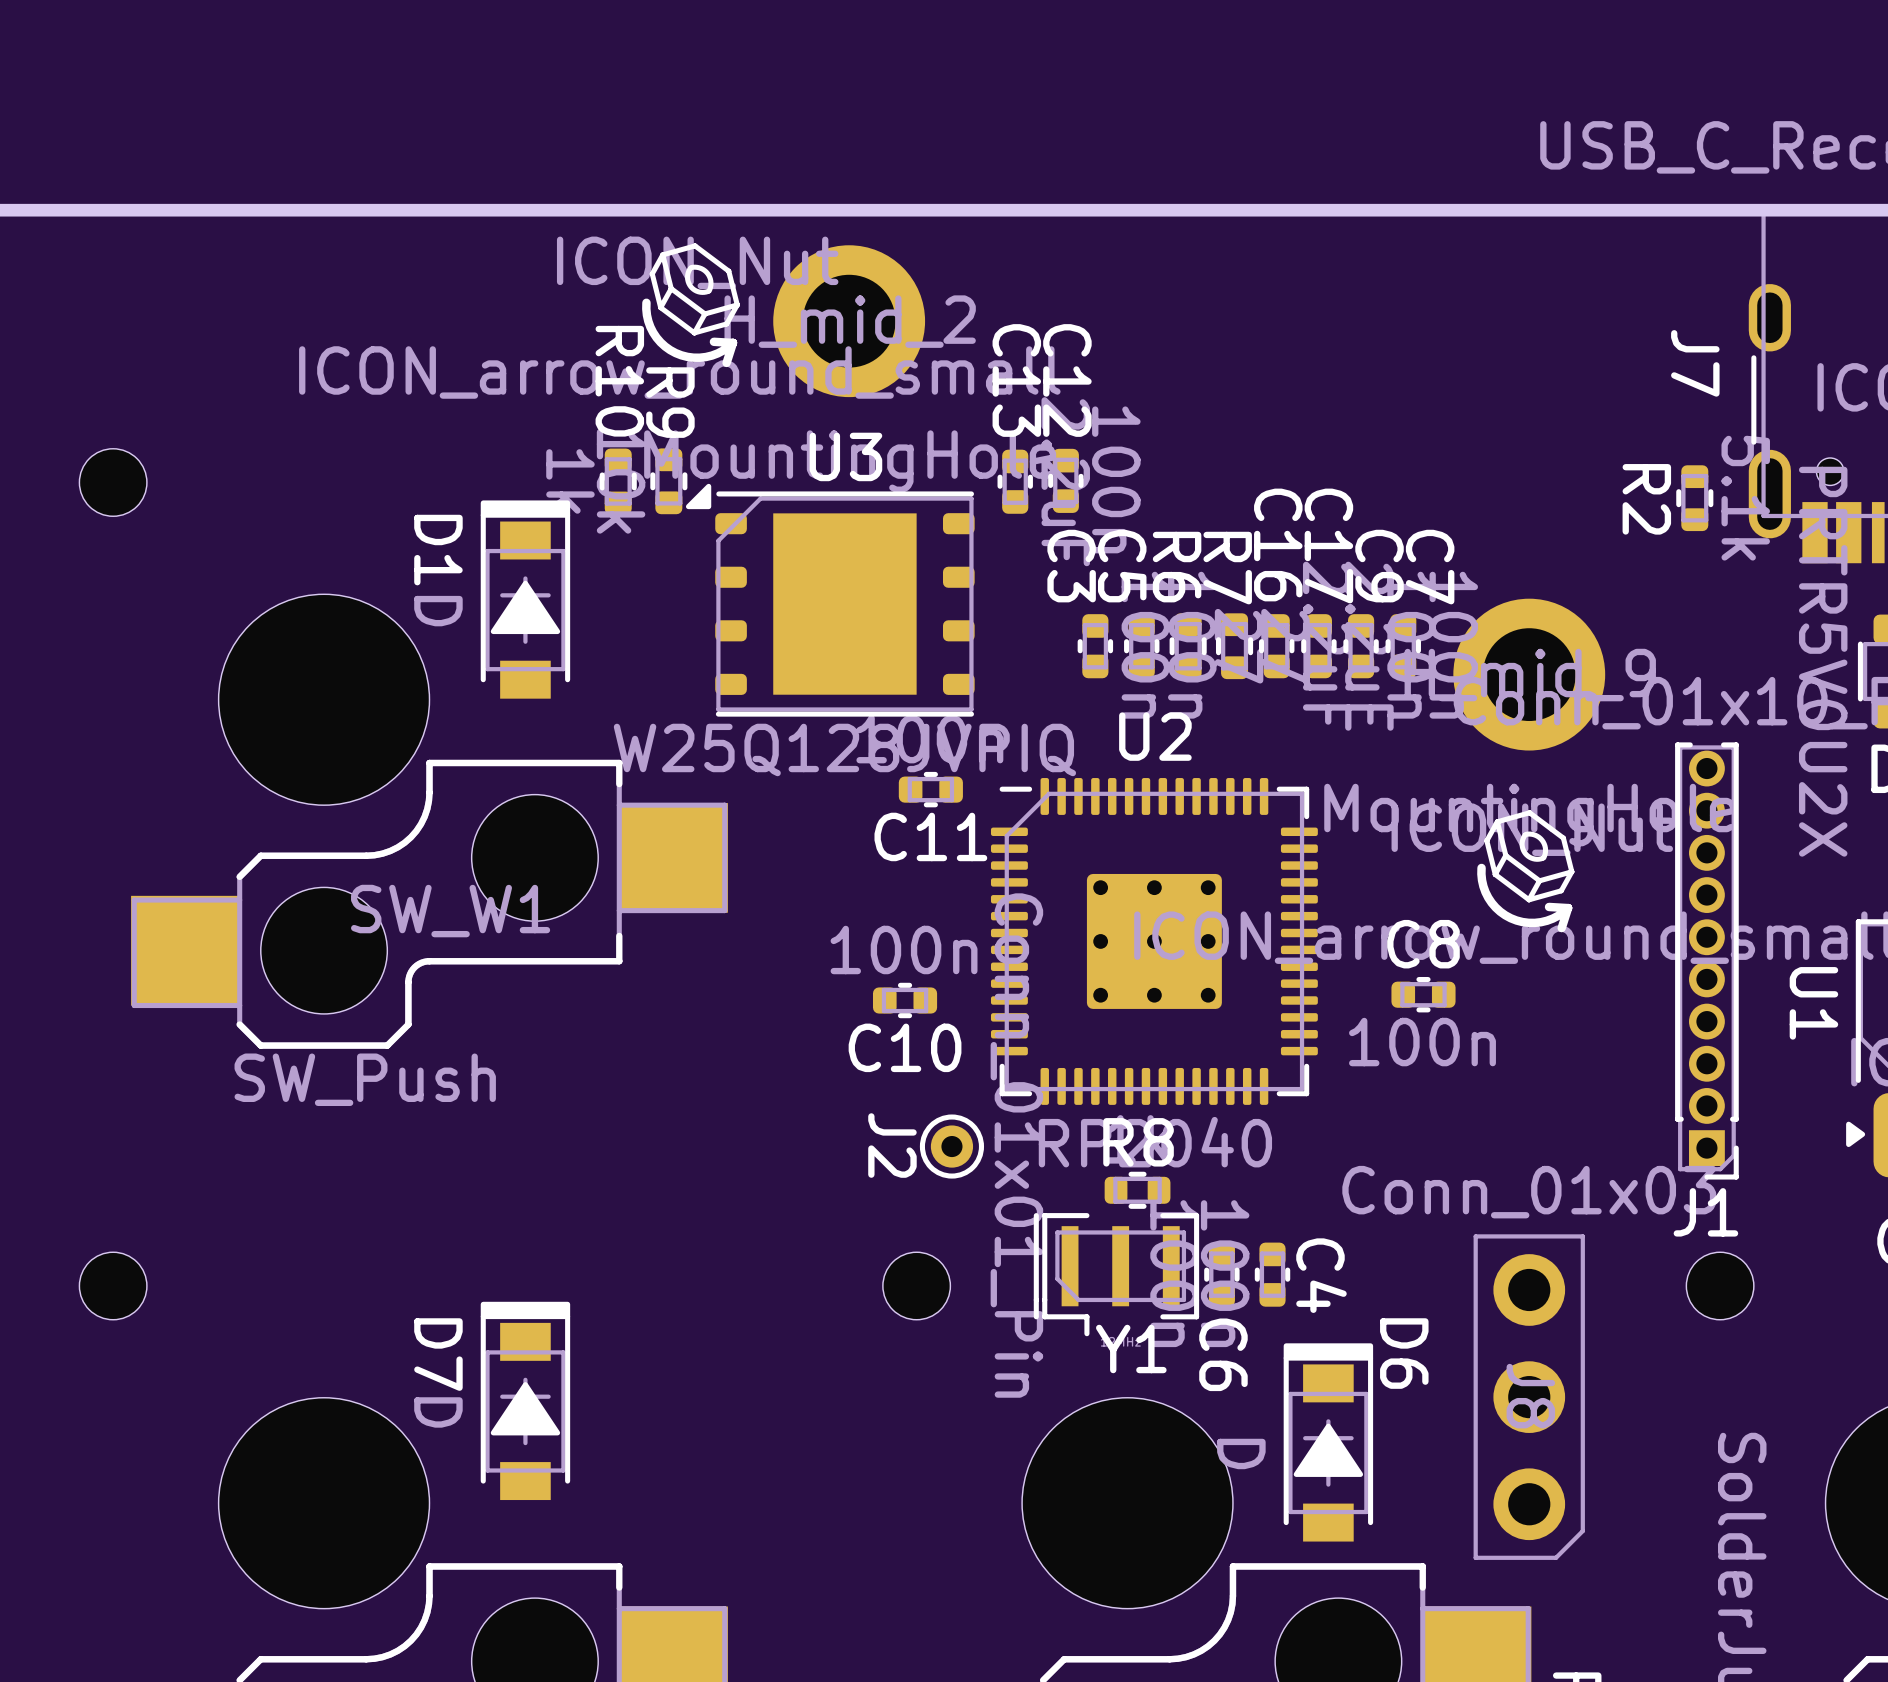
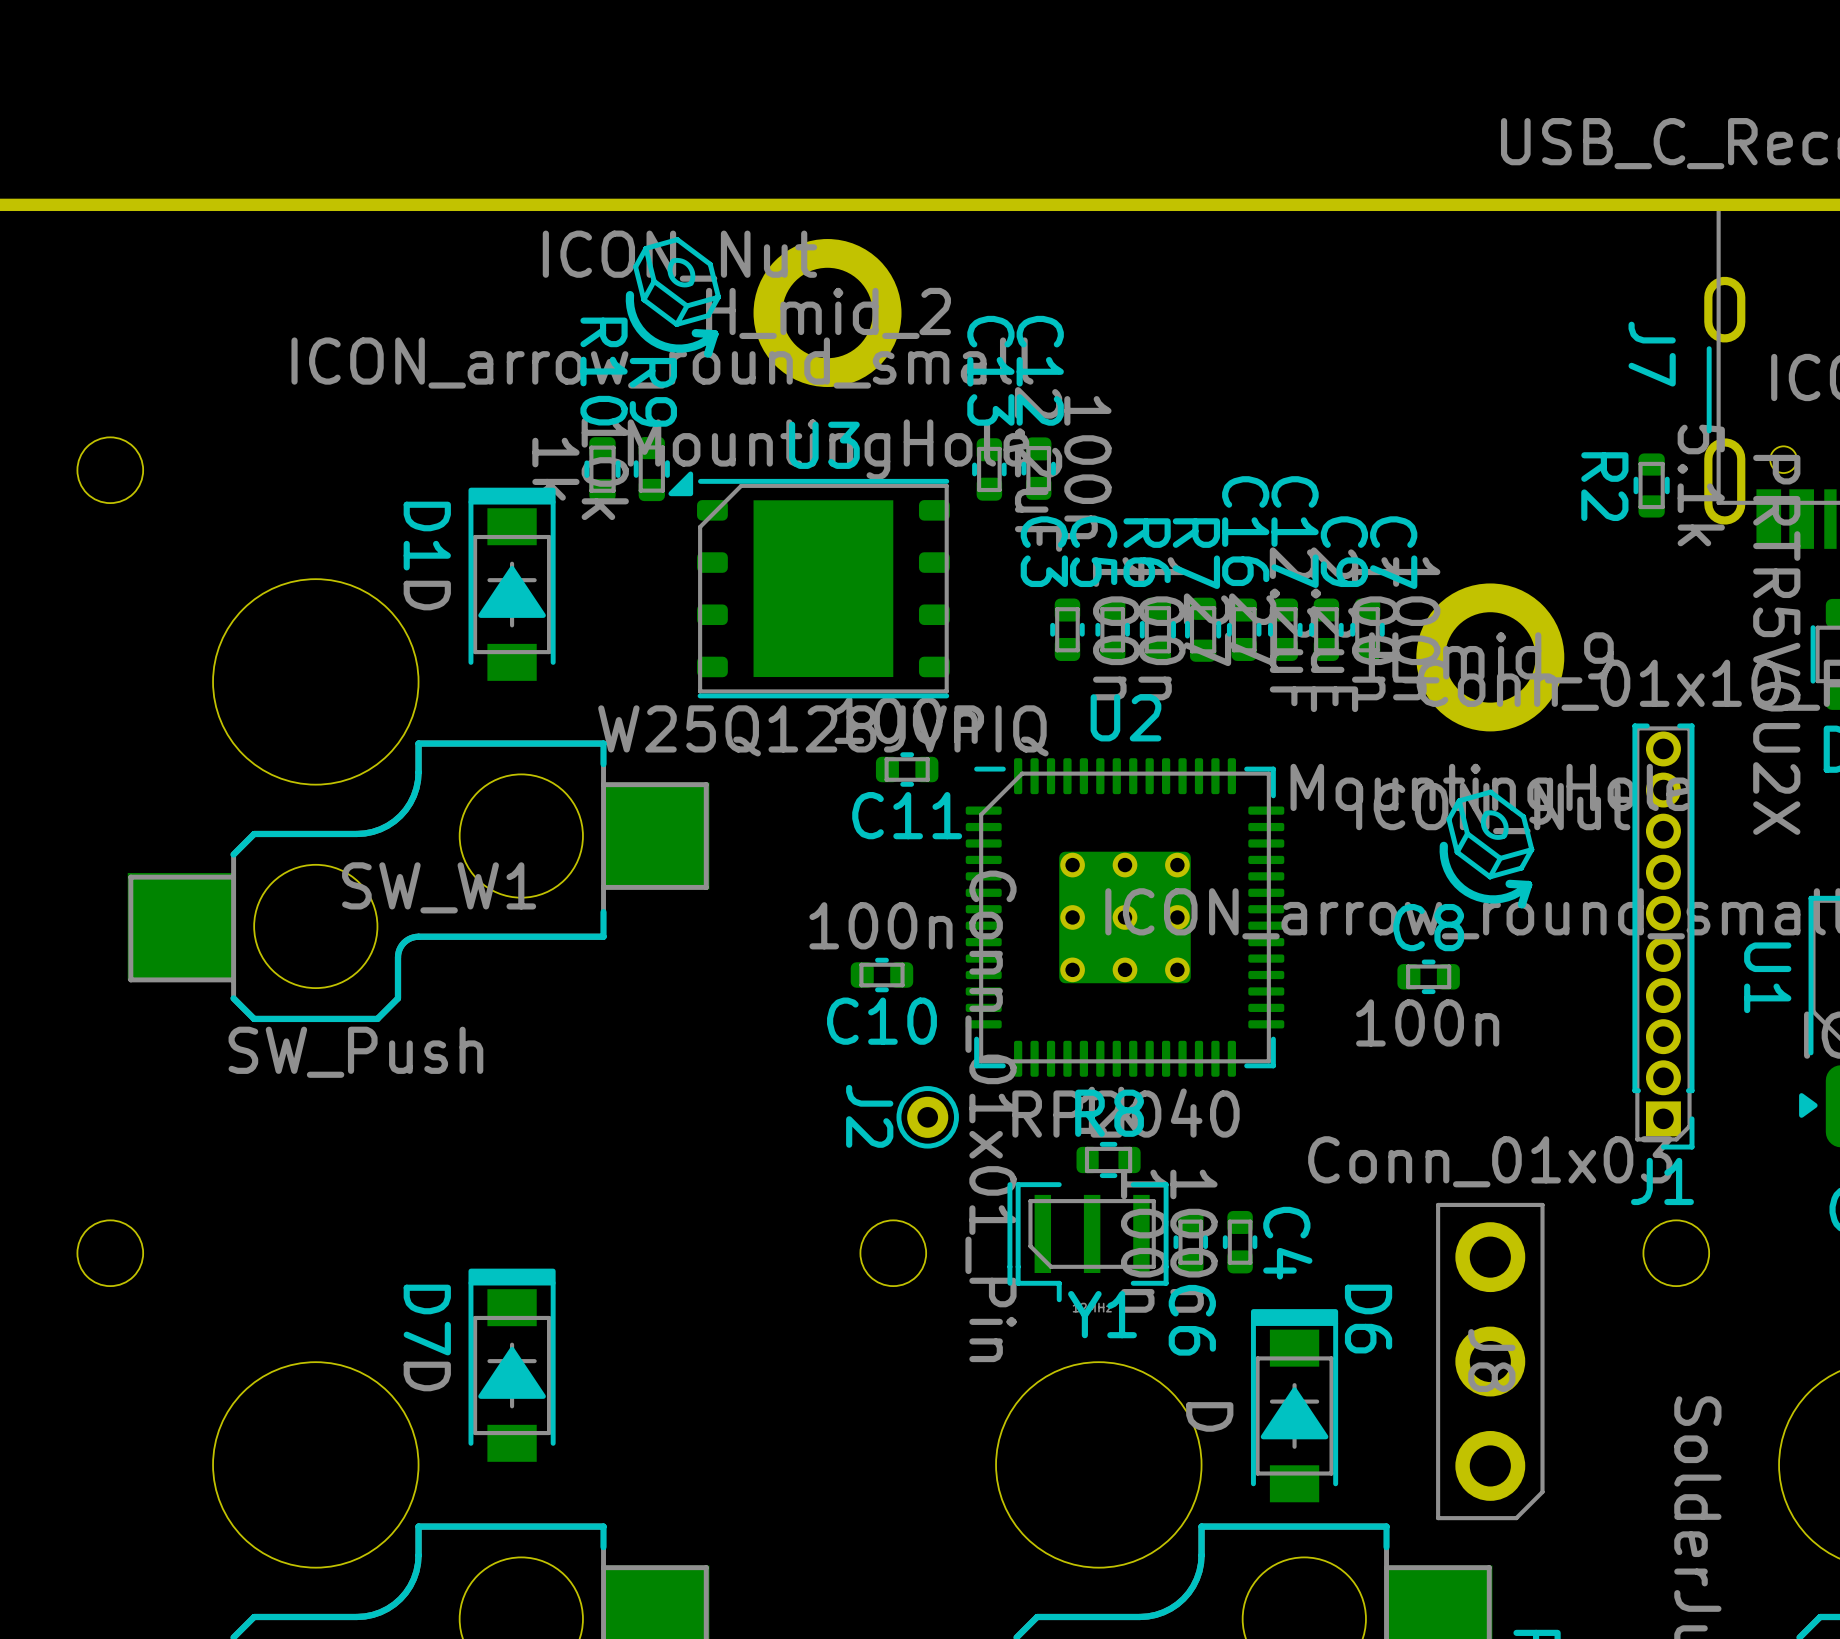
C8 position: (1423, 994) -> (1428, 976)

